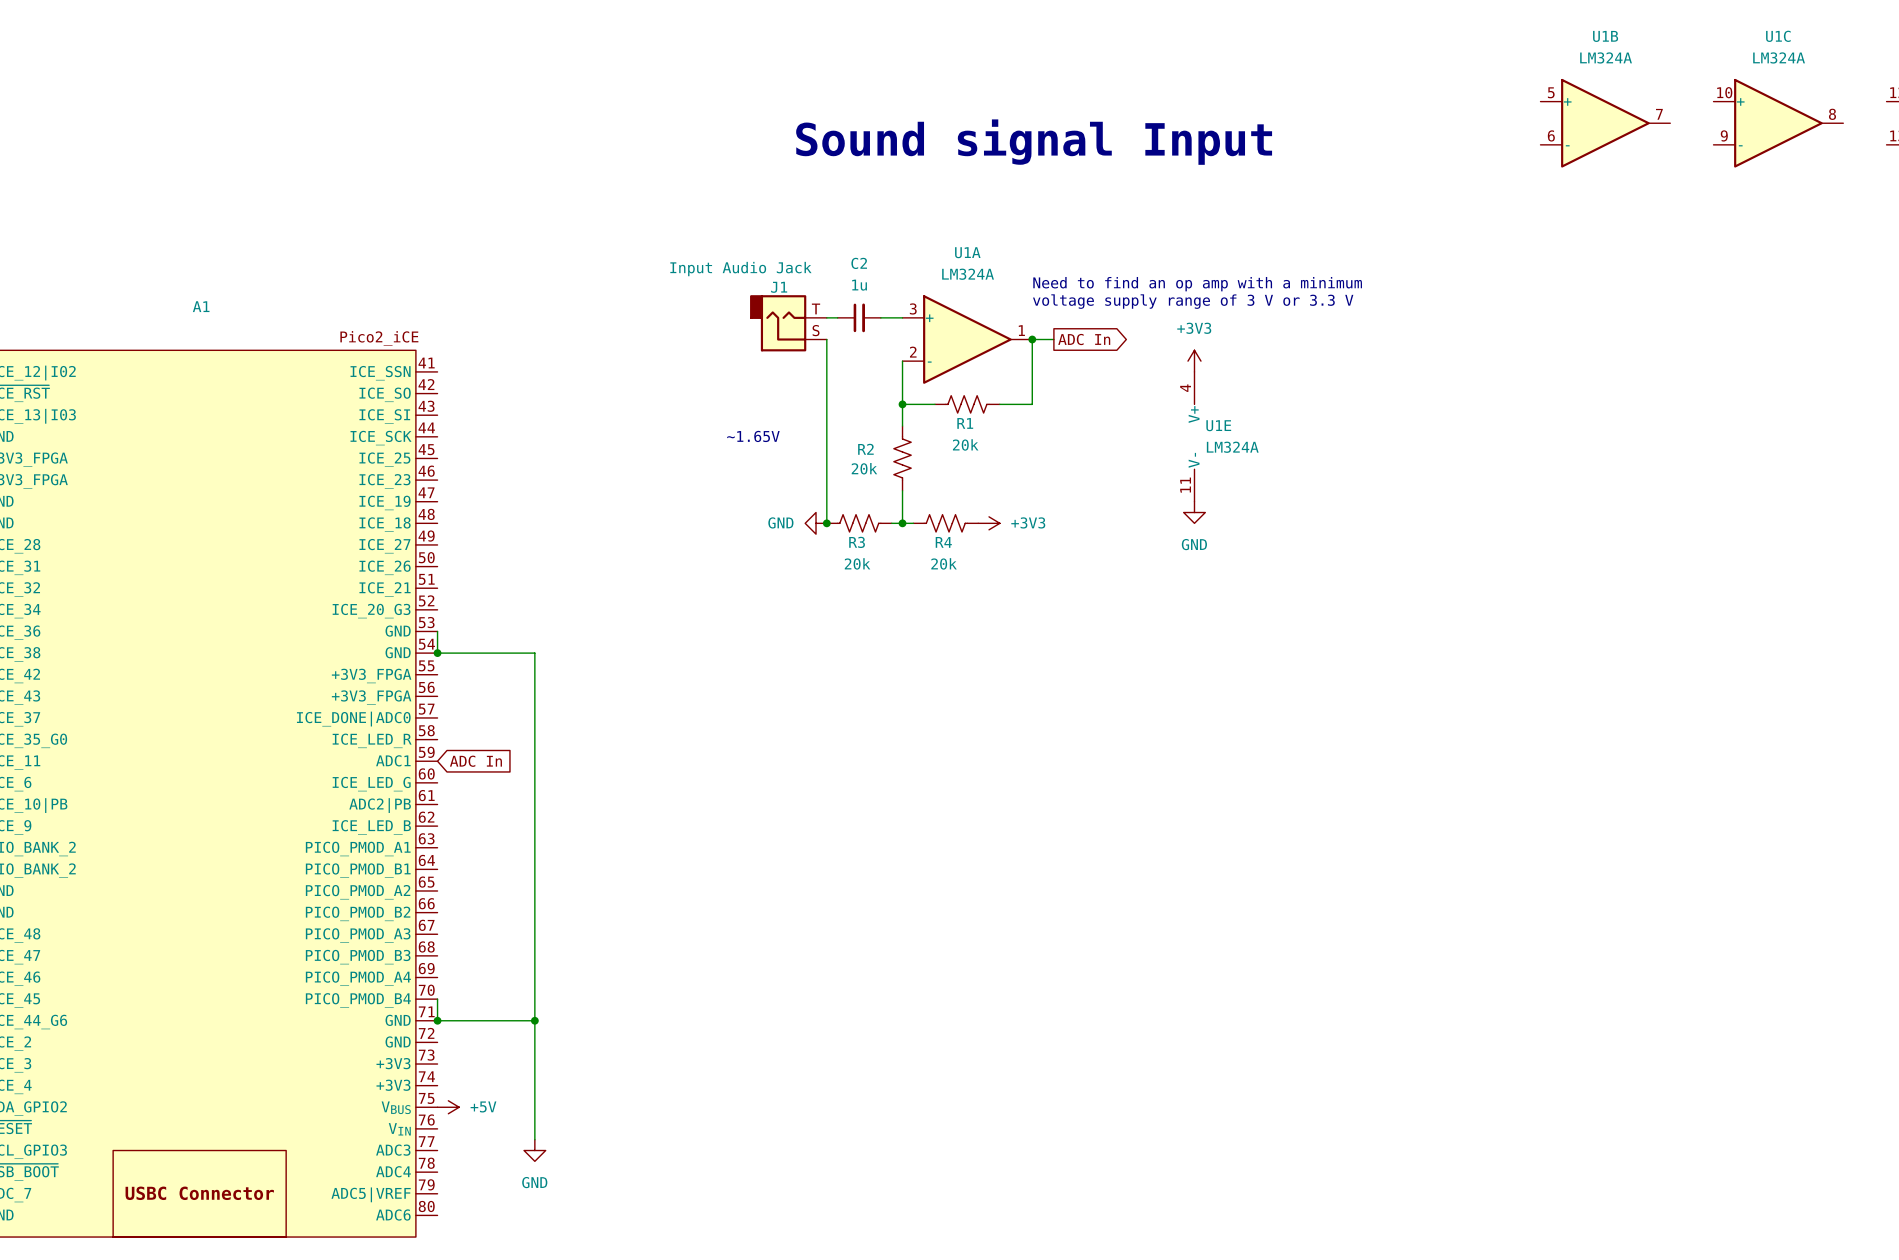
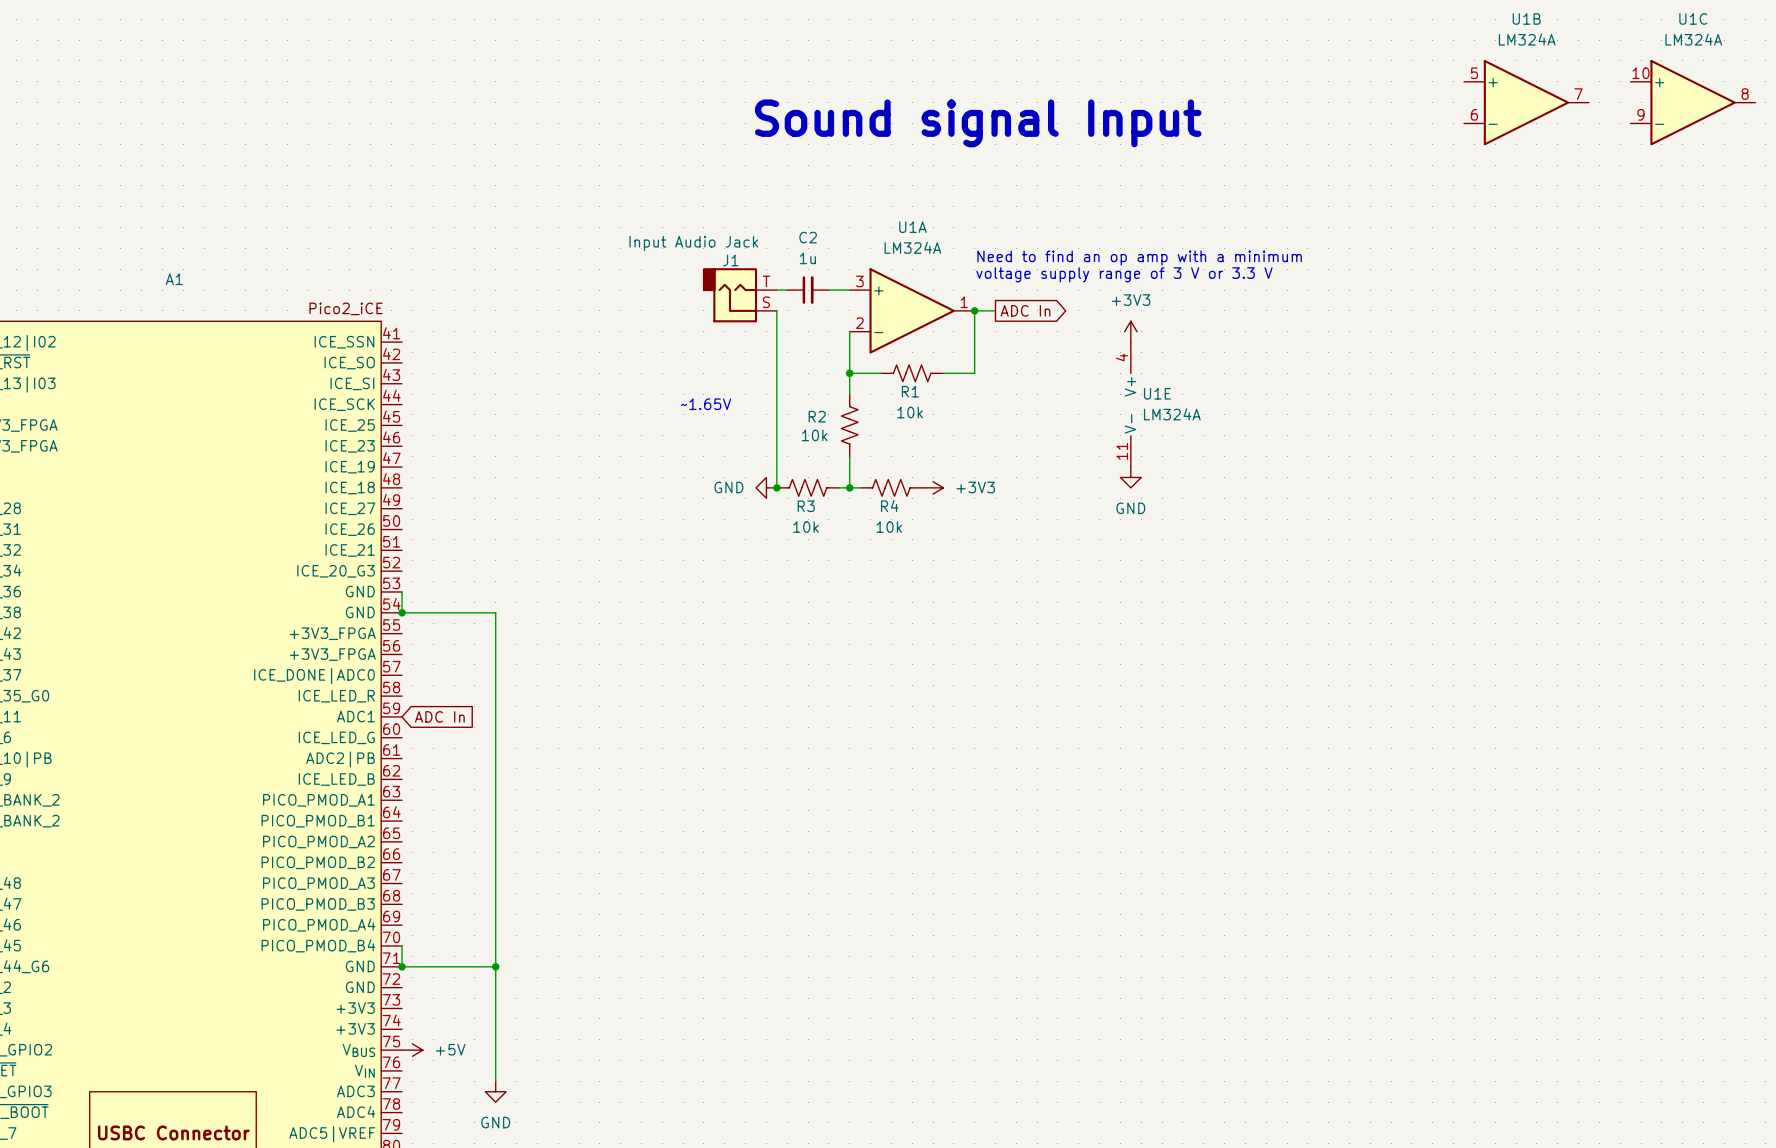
R1 value: 20k (965, 444) -> 10k (910, 412)
R2 value: 20k (864, 468) -> 10k (814, 435)
R3 value: 20k (857, 563) -> 10k (805, 527)
R4 value: 20k (944, 563) -> 10k (889, 527)

